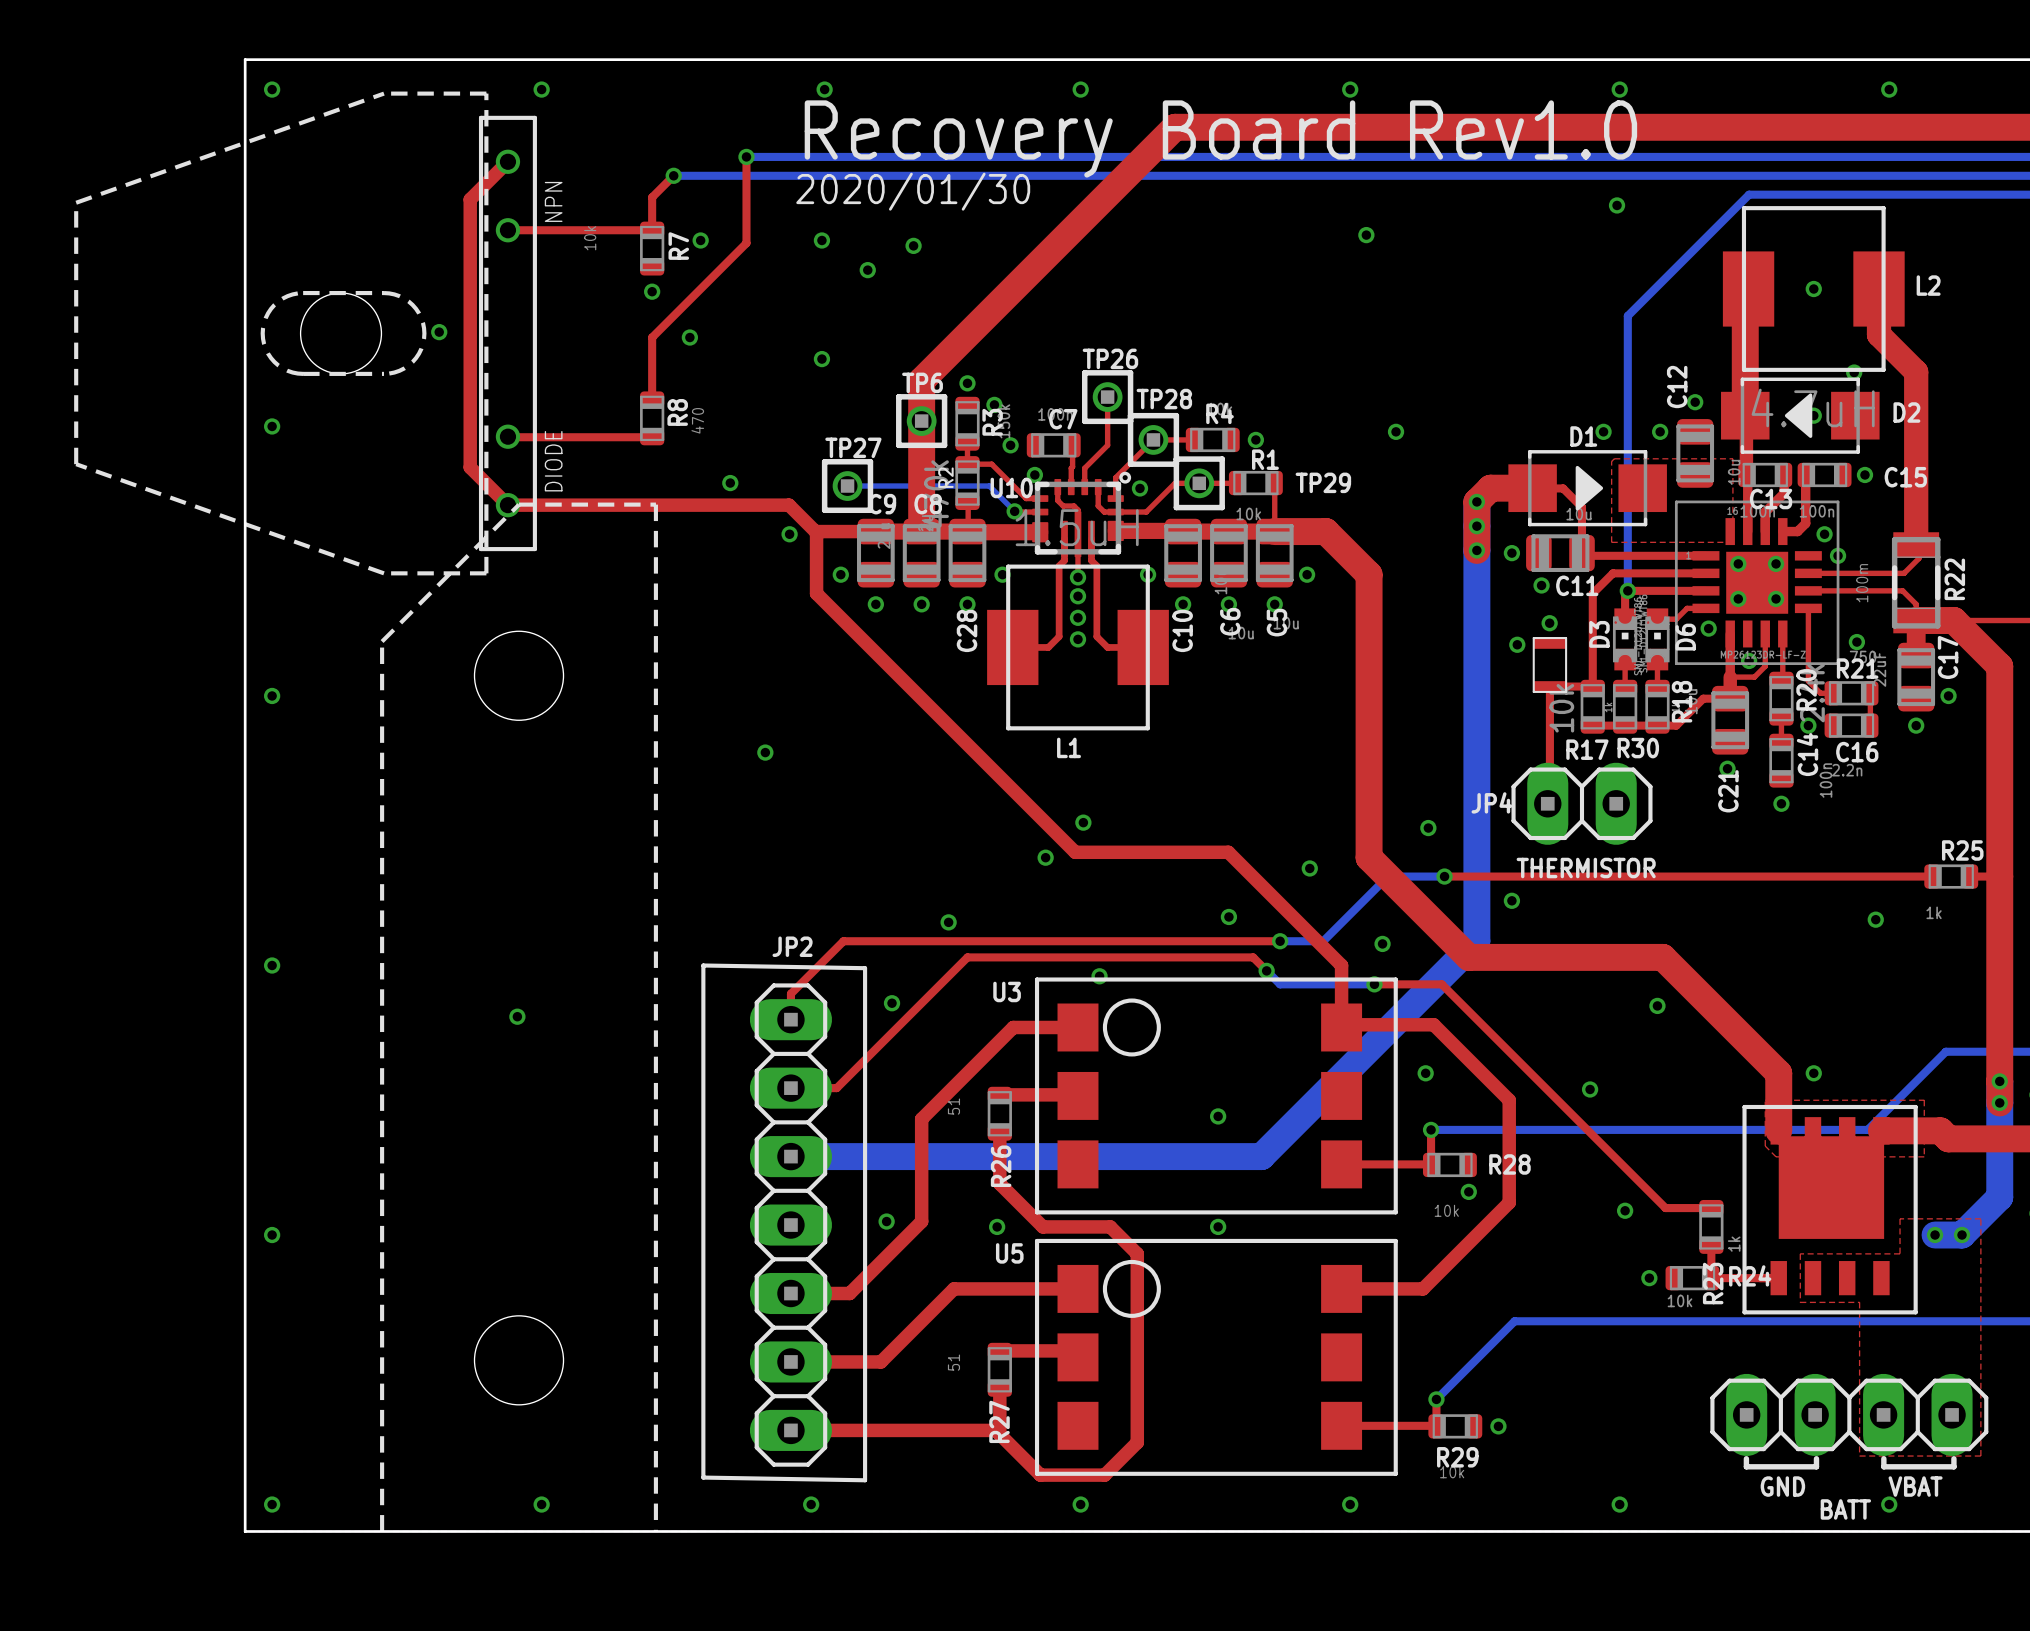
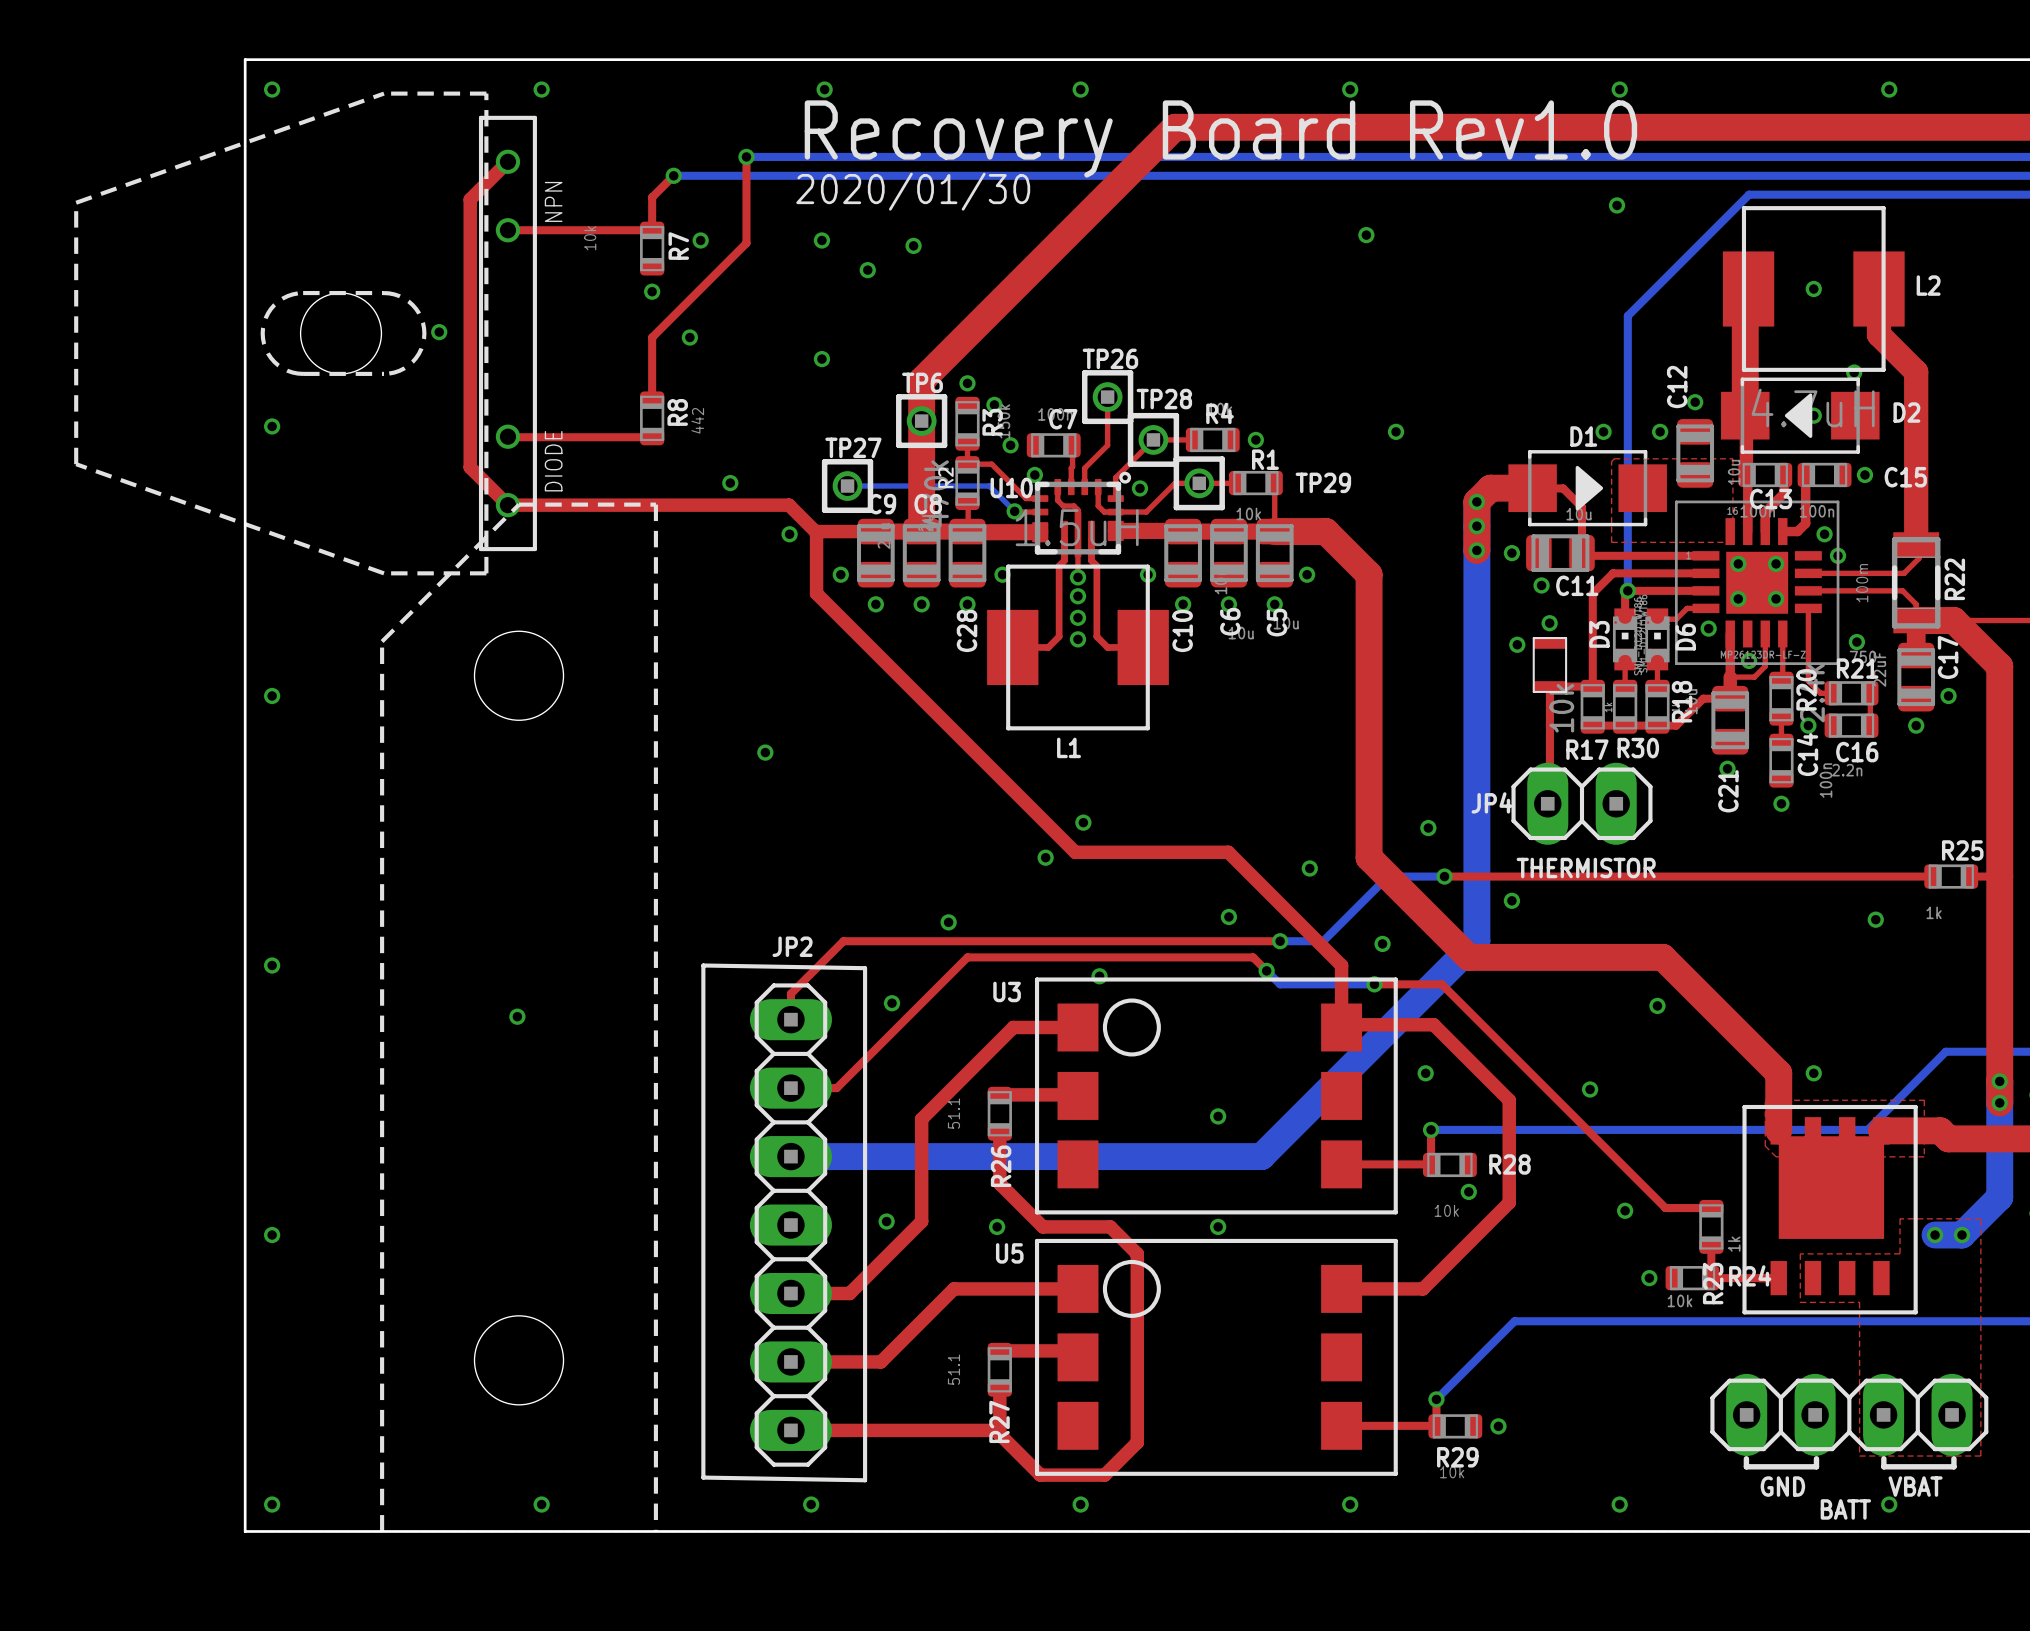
R8 value: 470 (697, 420) -> 442 (697, 420)
R26 value: 51 (953, 1106) -> 51.1 (953, 1113)
R27 value: 51 (953, 1362) -> 51.1 (953, 1369)

